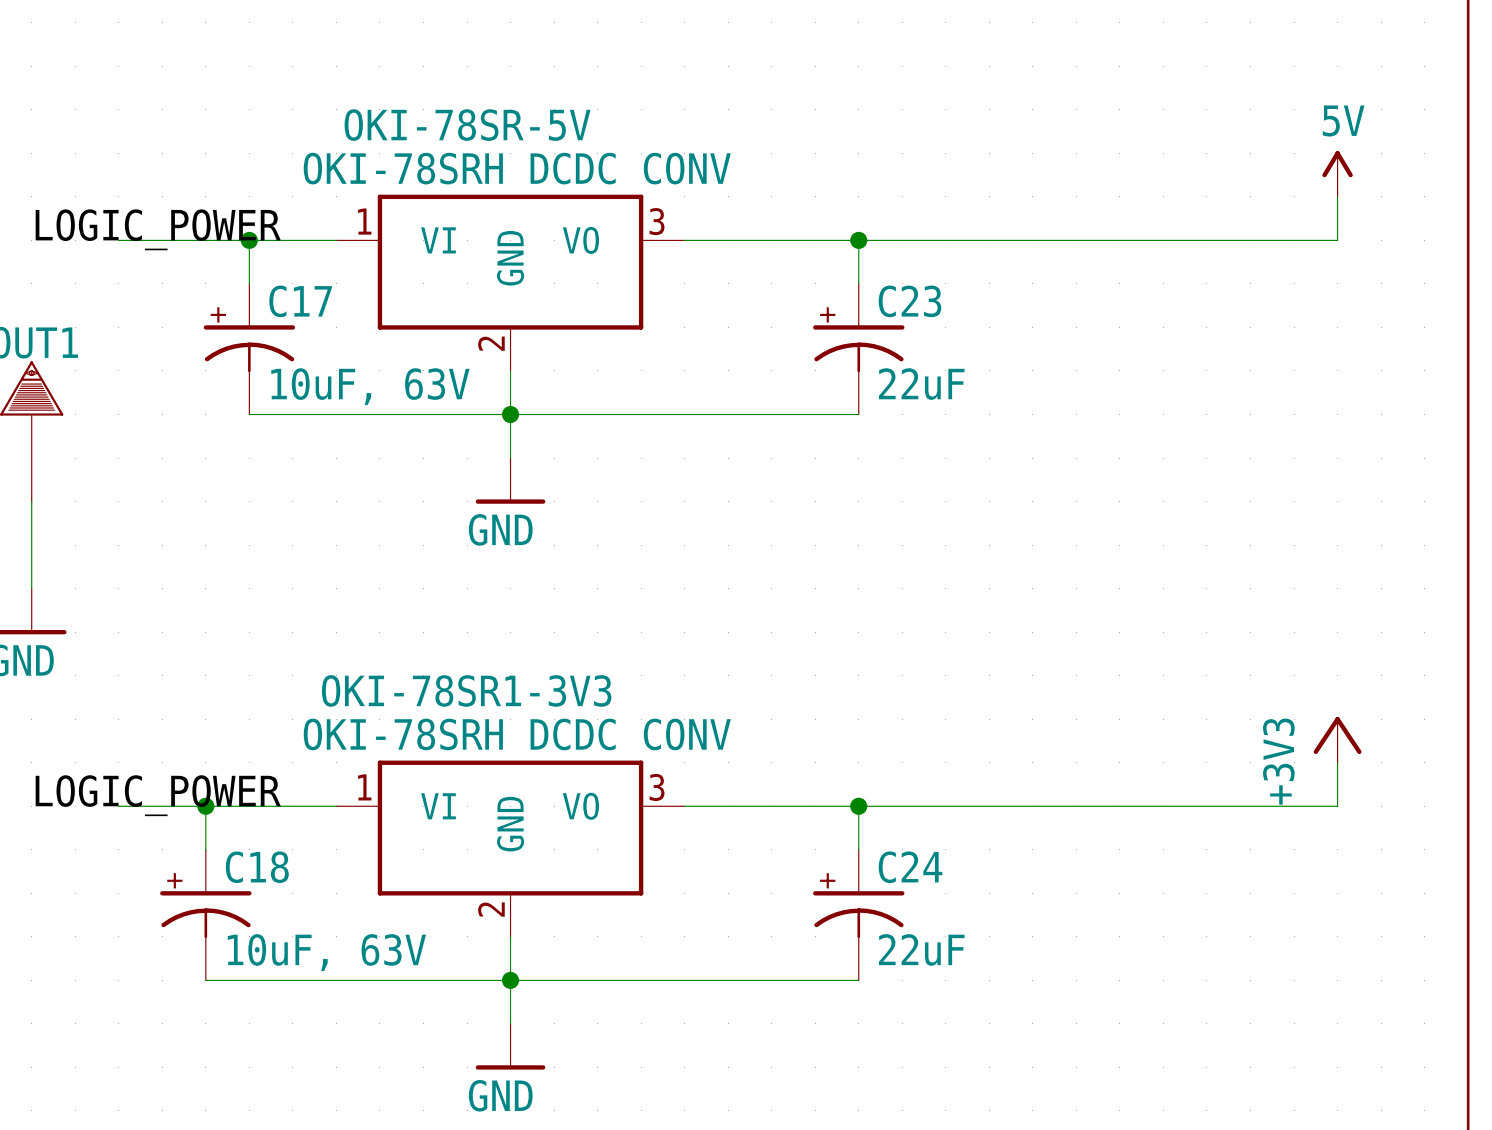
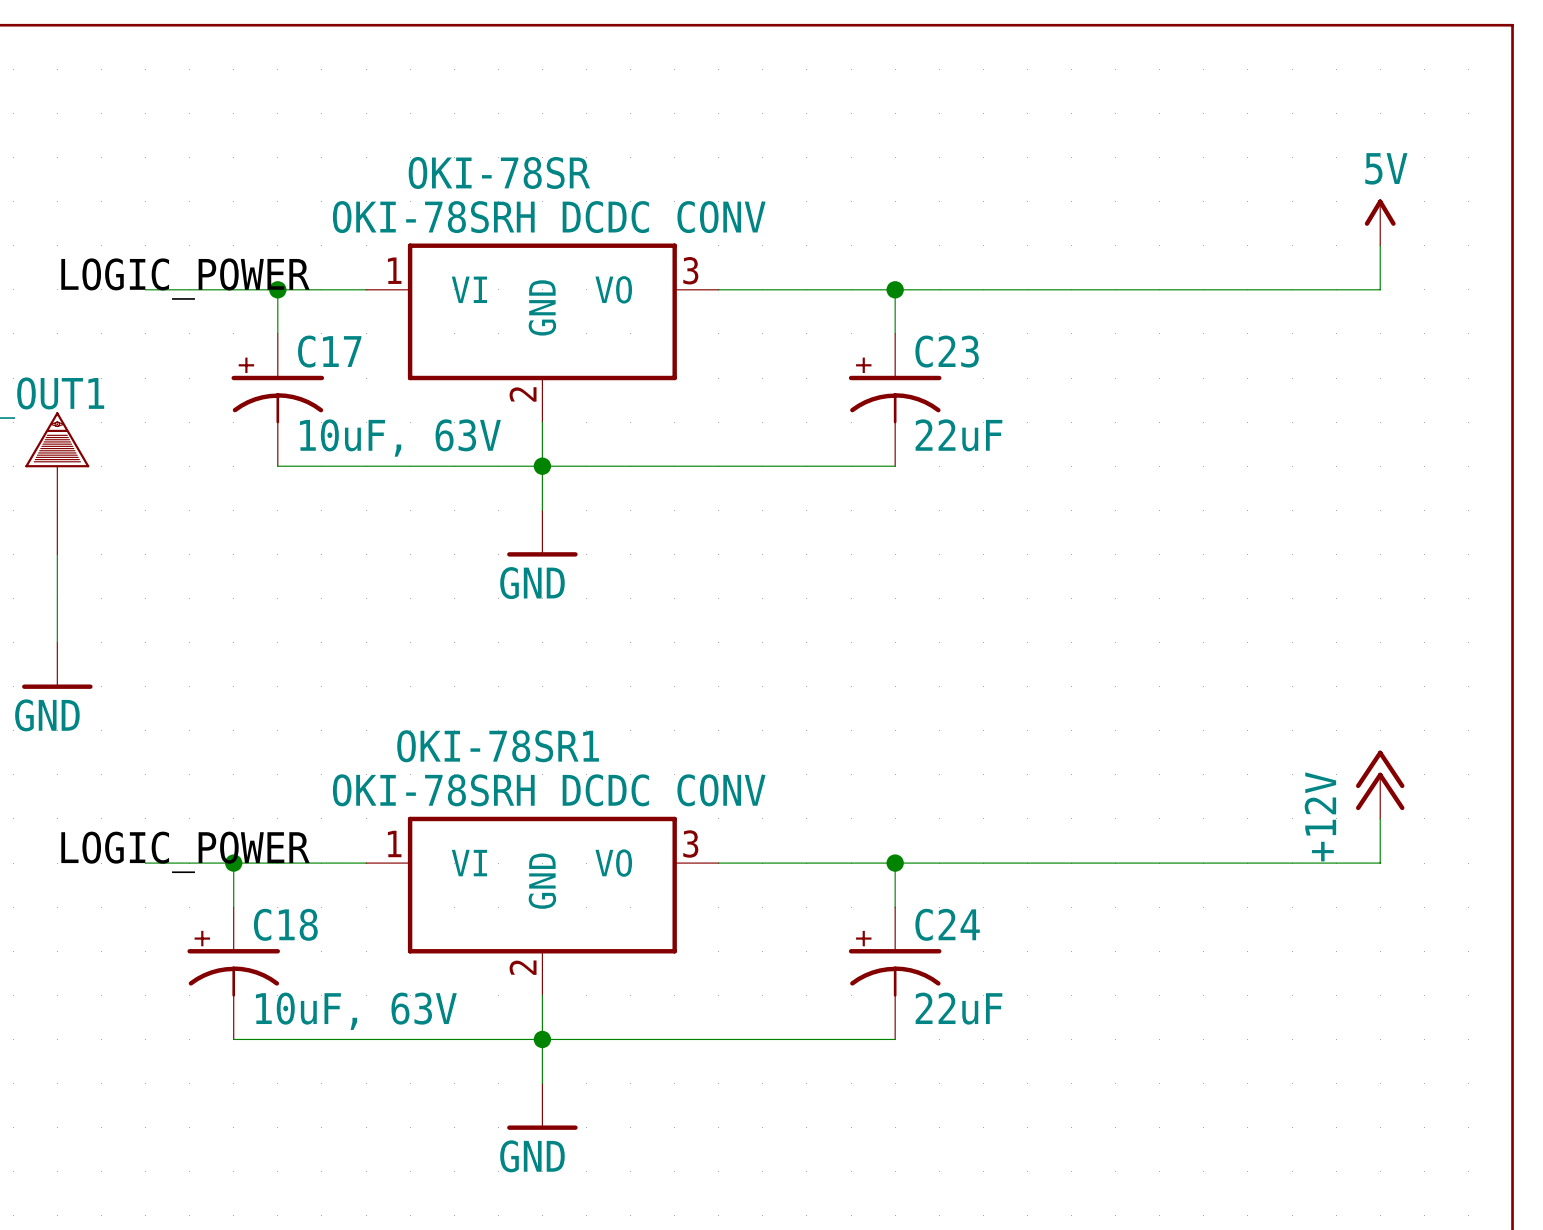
OKI-78SR-5V name: OKI-78SR-5V (467, 125) -> OKI-78SR (499, 172)
OKI-78SR1-3V3 name: OKI-78SR1-3V3 (466, 690) -> OKI-78SR1 (498, 746)
power symbol: +3V3 (1337, 739) -> +12V (1380, 784)

